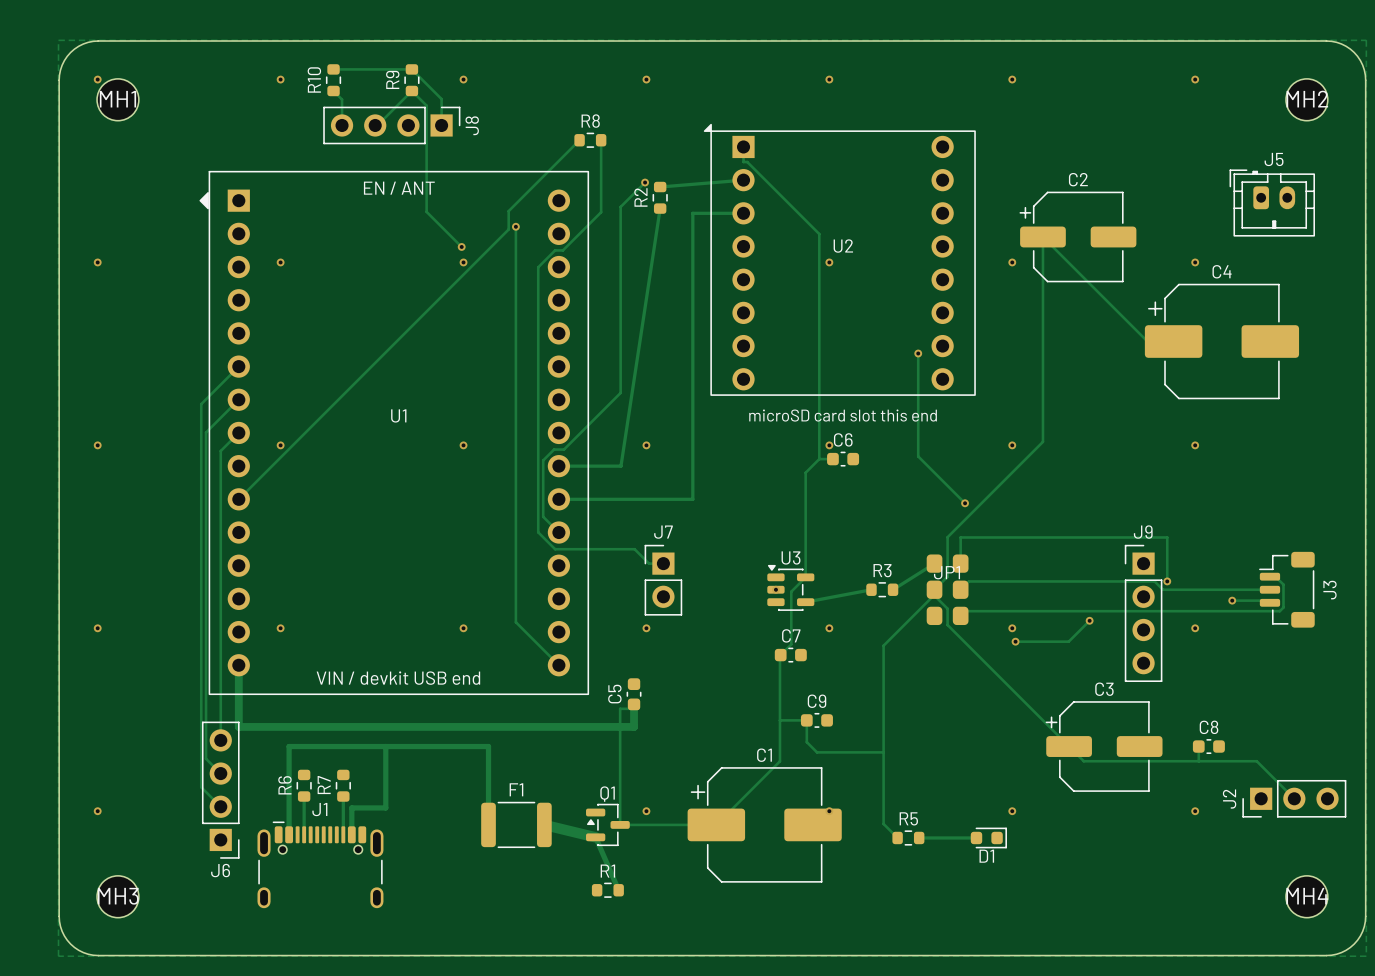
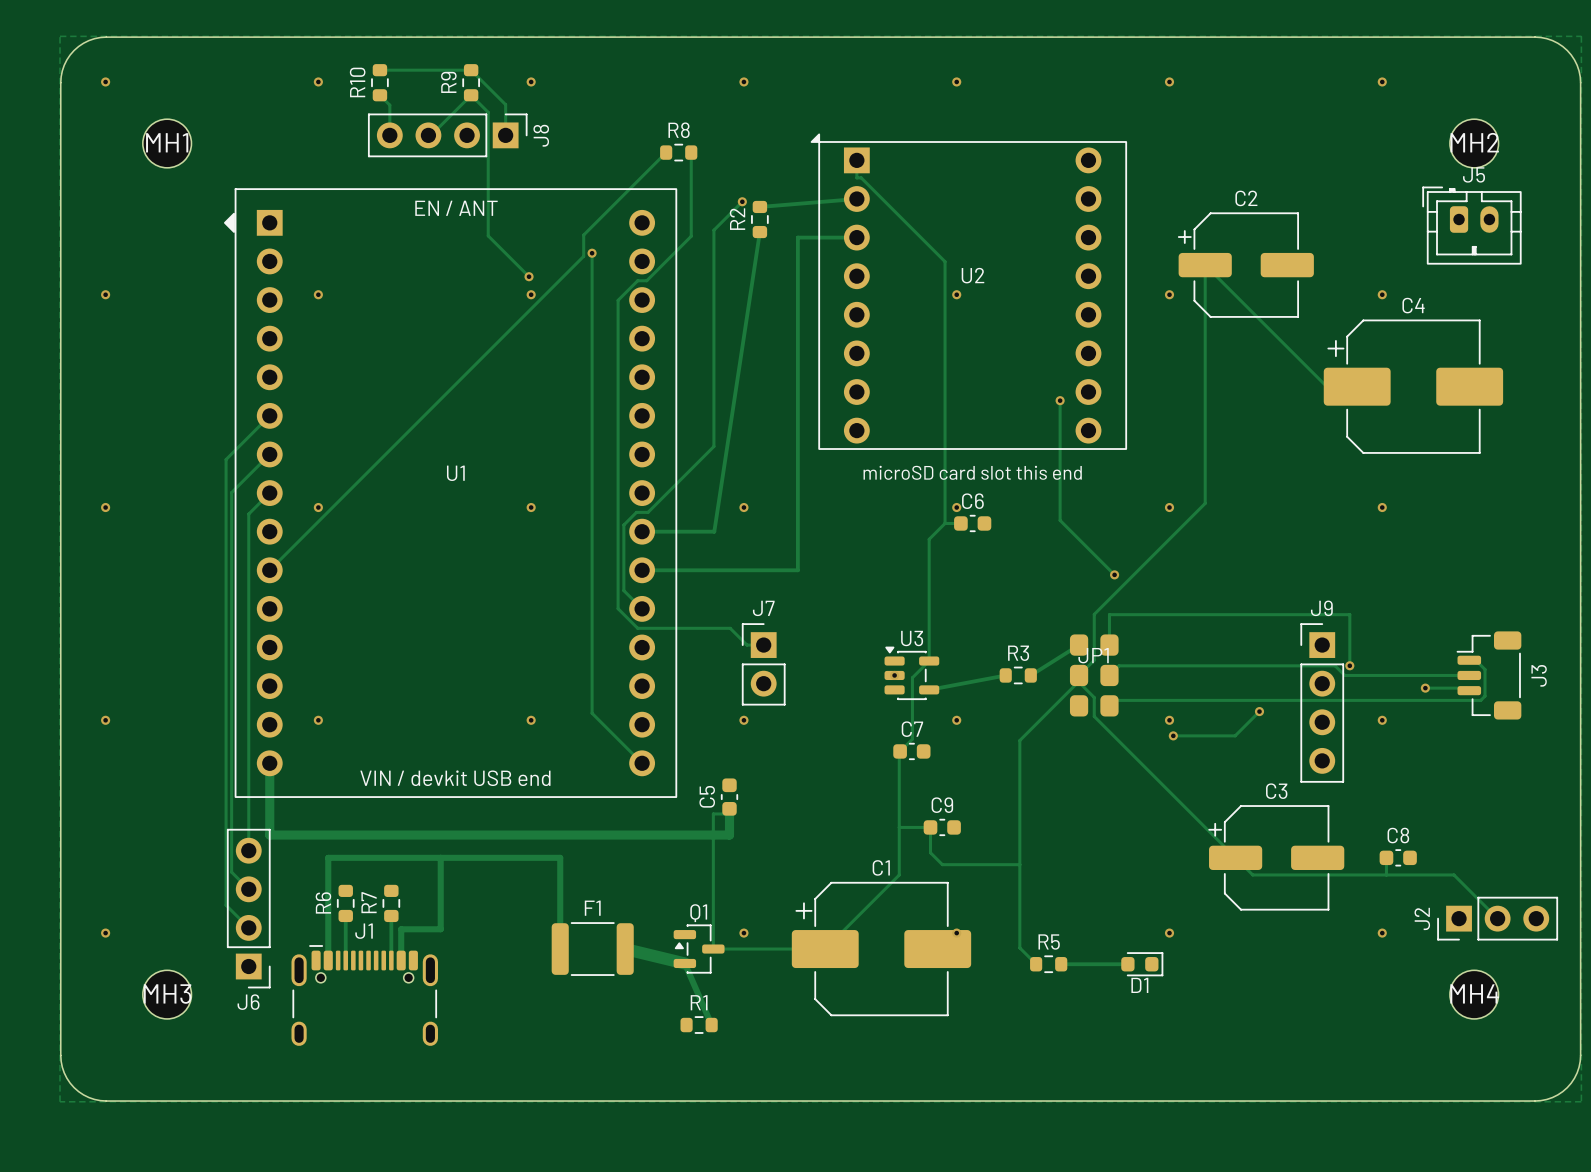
MH1 position: (117, 99) -> (167, 143)
MH2 position: (1306, 99) -> (1474, 143)
MH3 position: (117, 896) -> (167, 994)
MH4 position: (1306, 896) -> (1474, 994)

